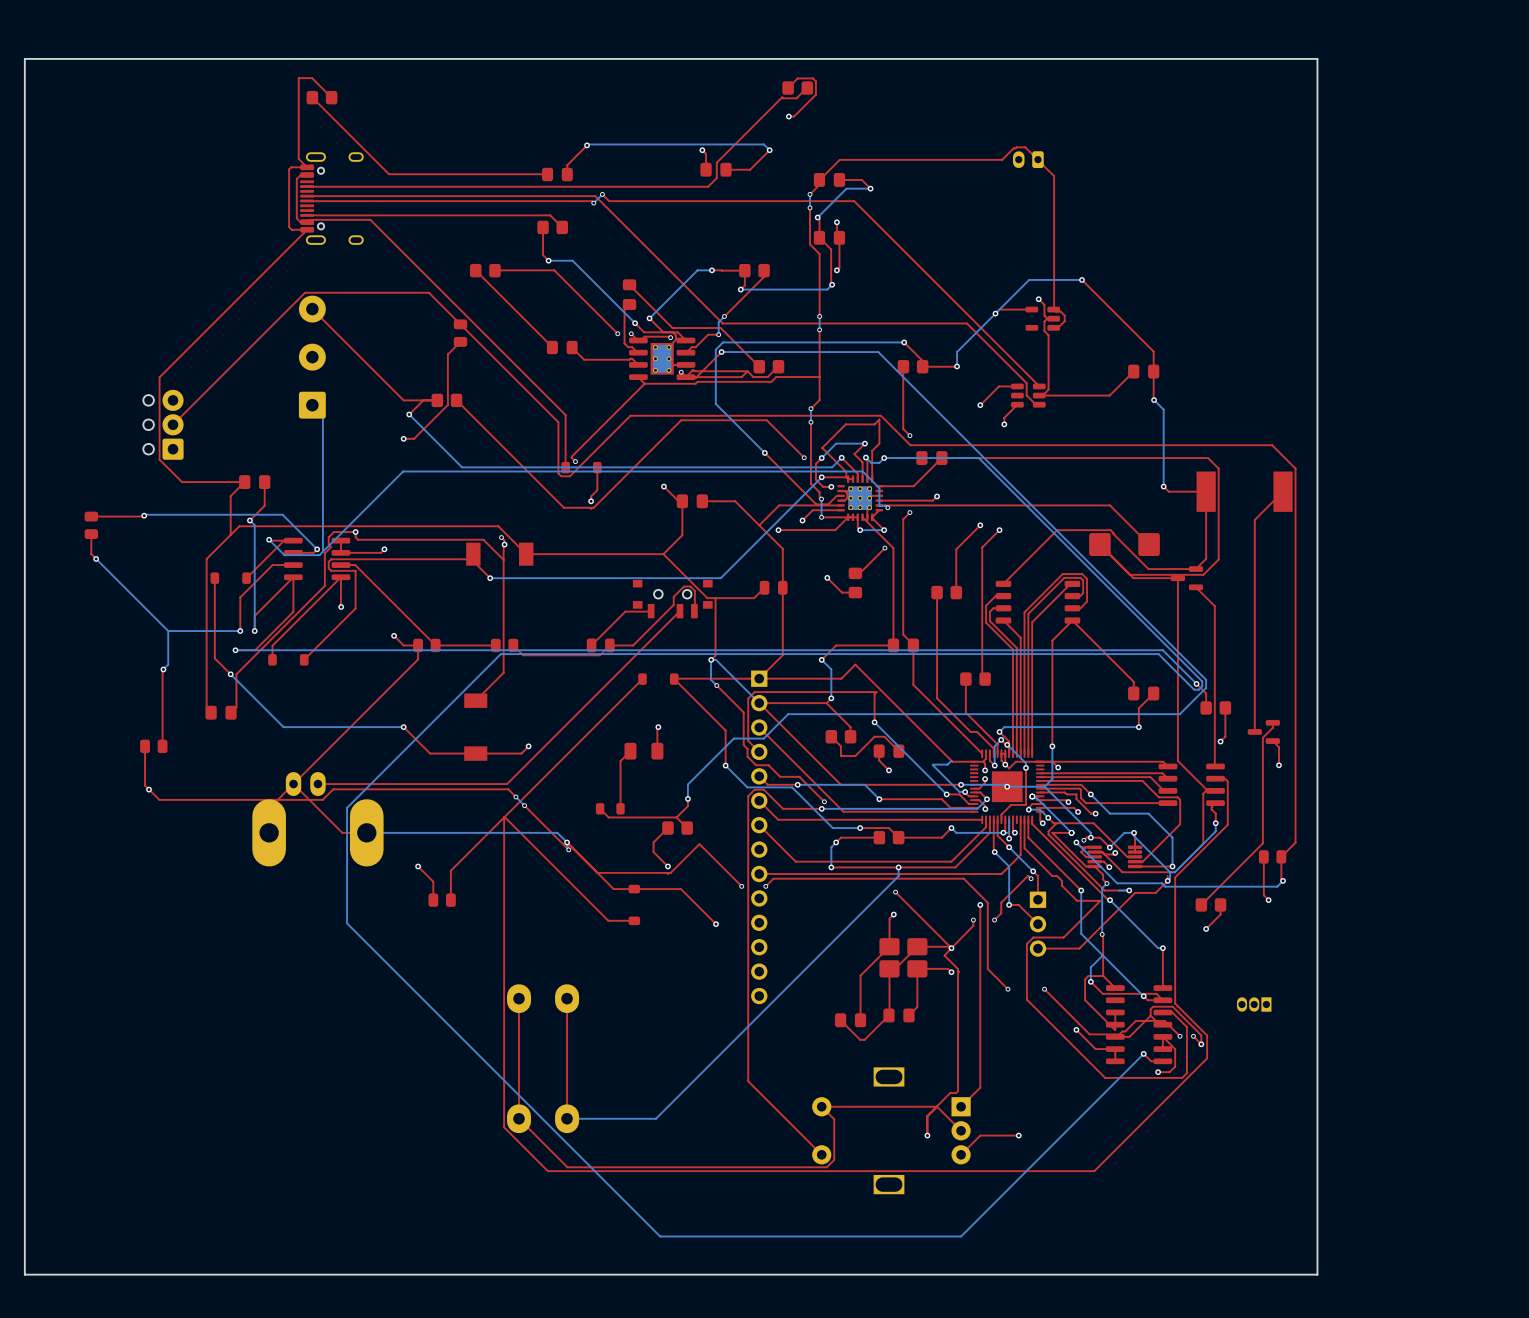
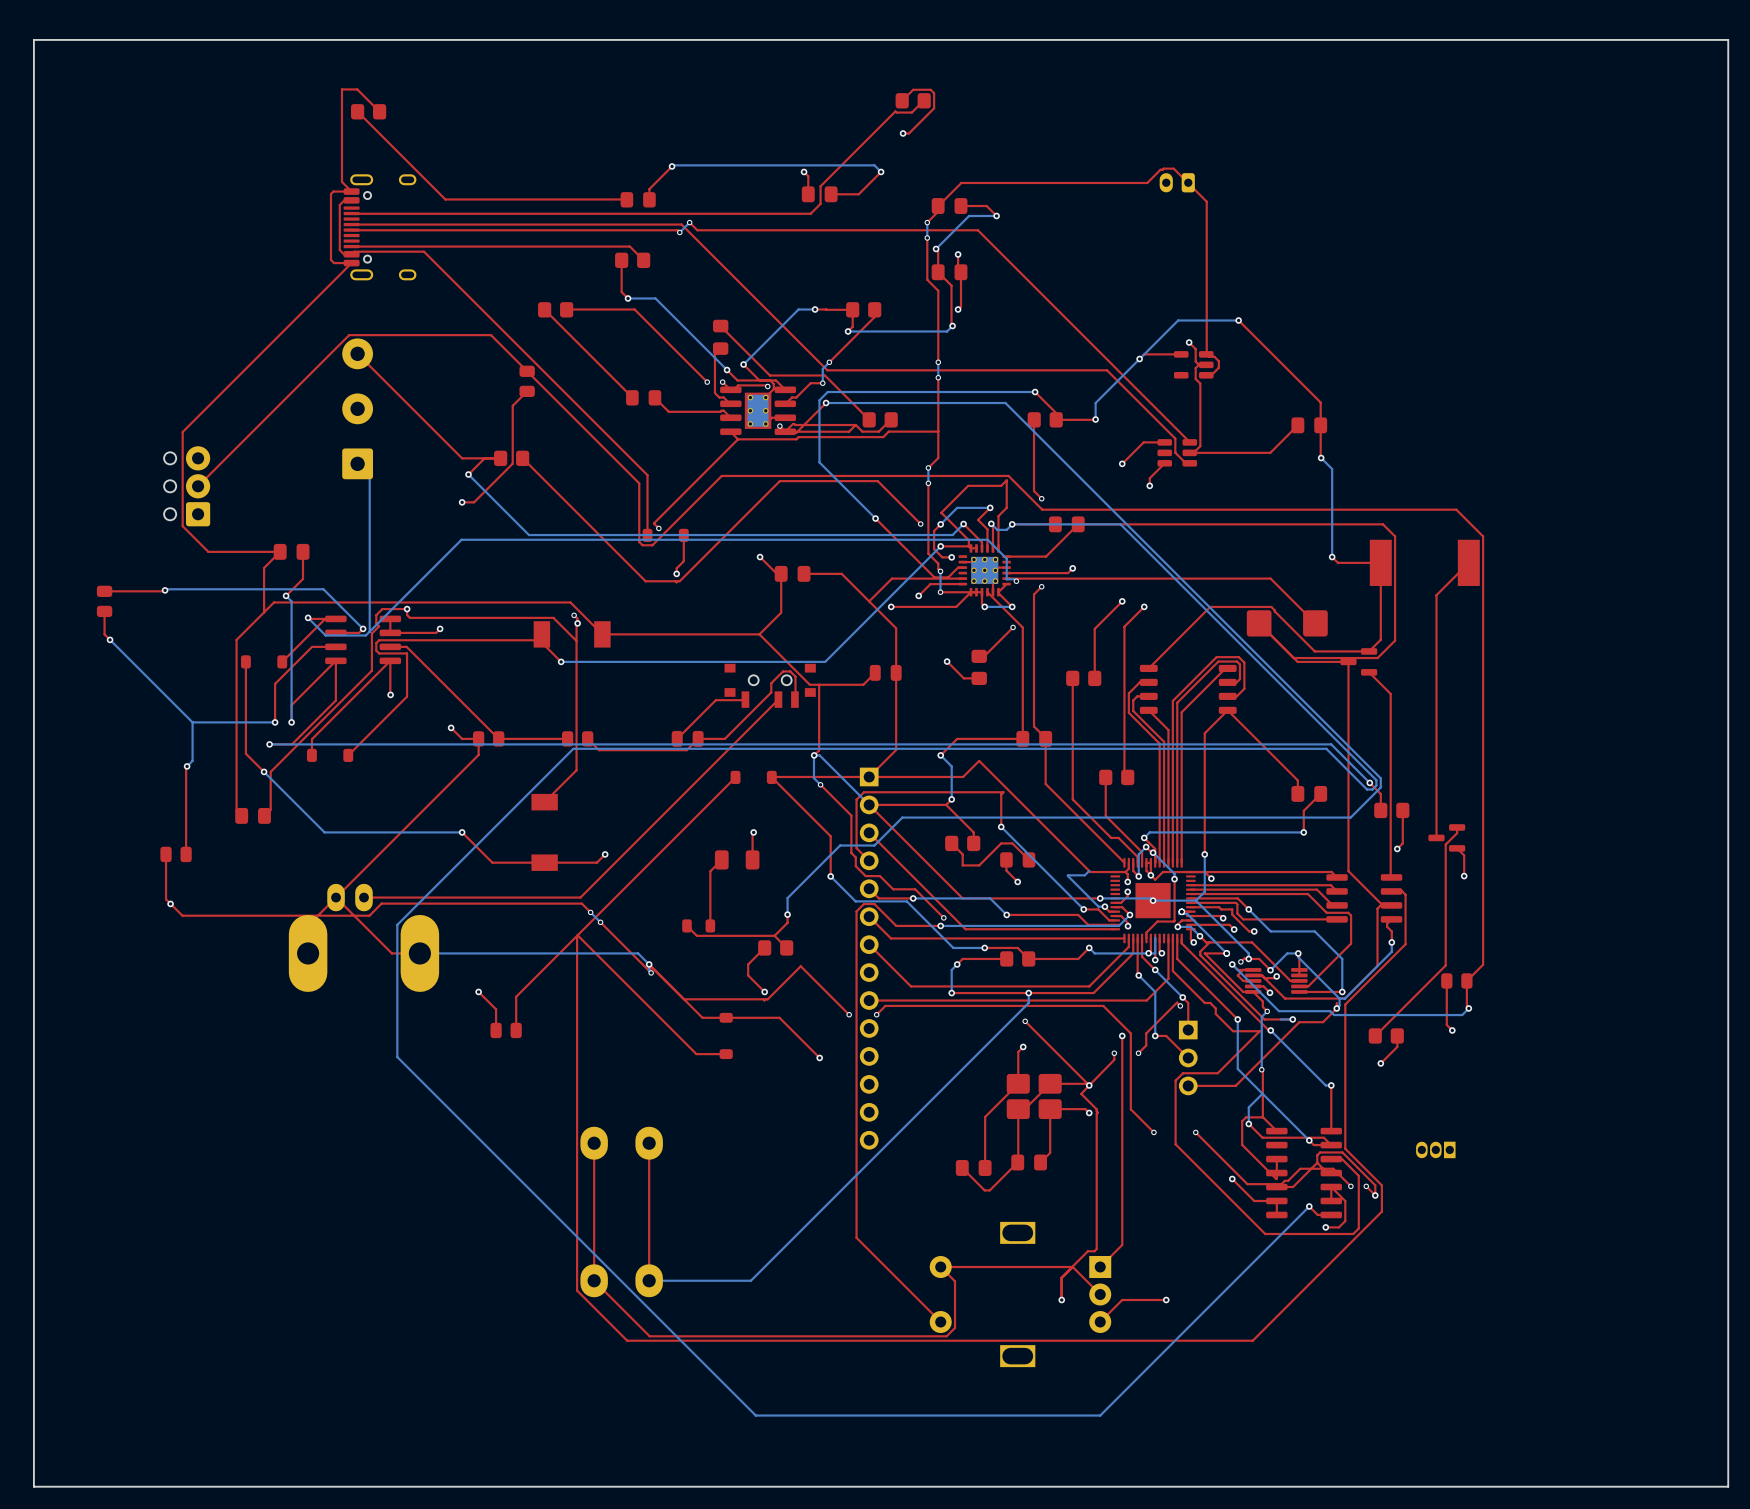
board edge: (1317, 58) (24, 58) (24, 1274) (1317, 1274) (1317, 58) -> (1728, 39) (1728, 1486) (33, 1486) (33, 39) (1728, 39)
top track: (844, 491) (847, 493) (847, 498) (841, 500) -> none

